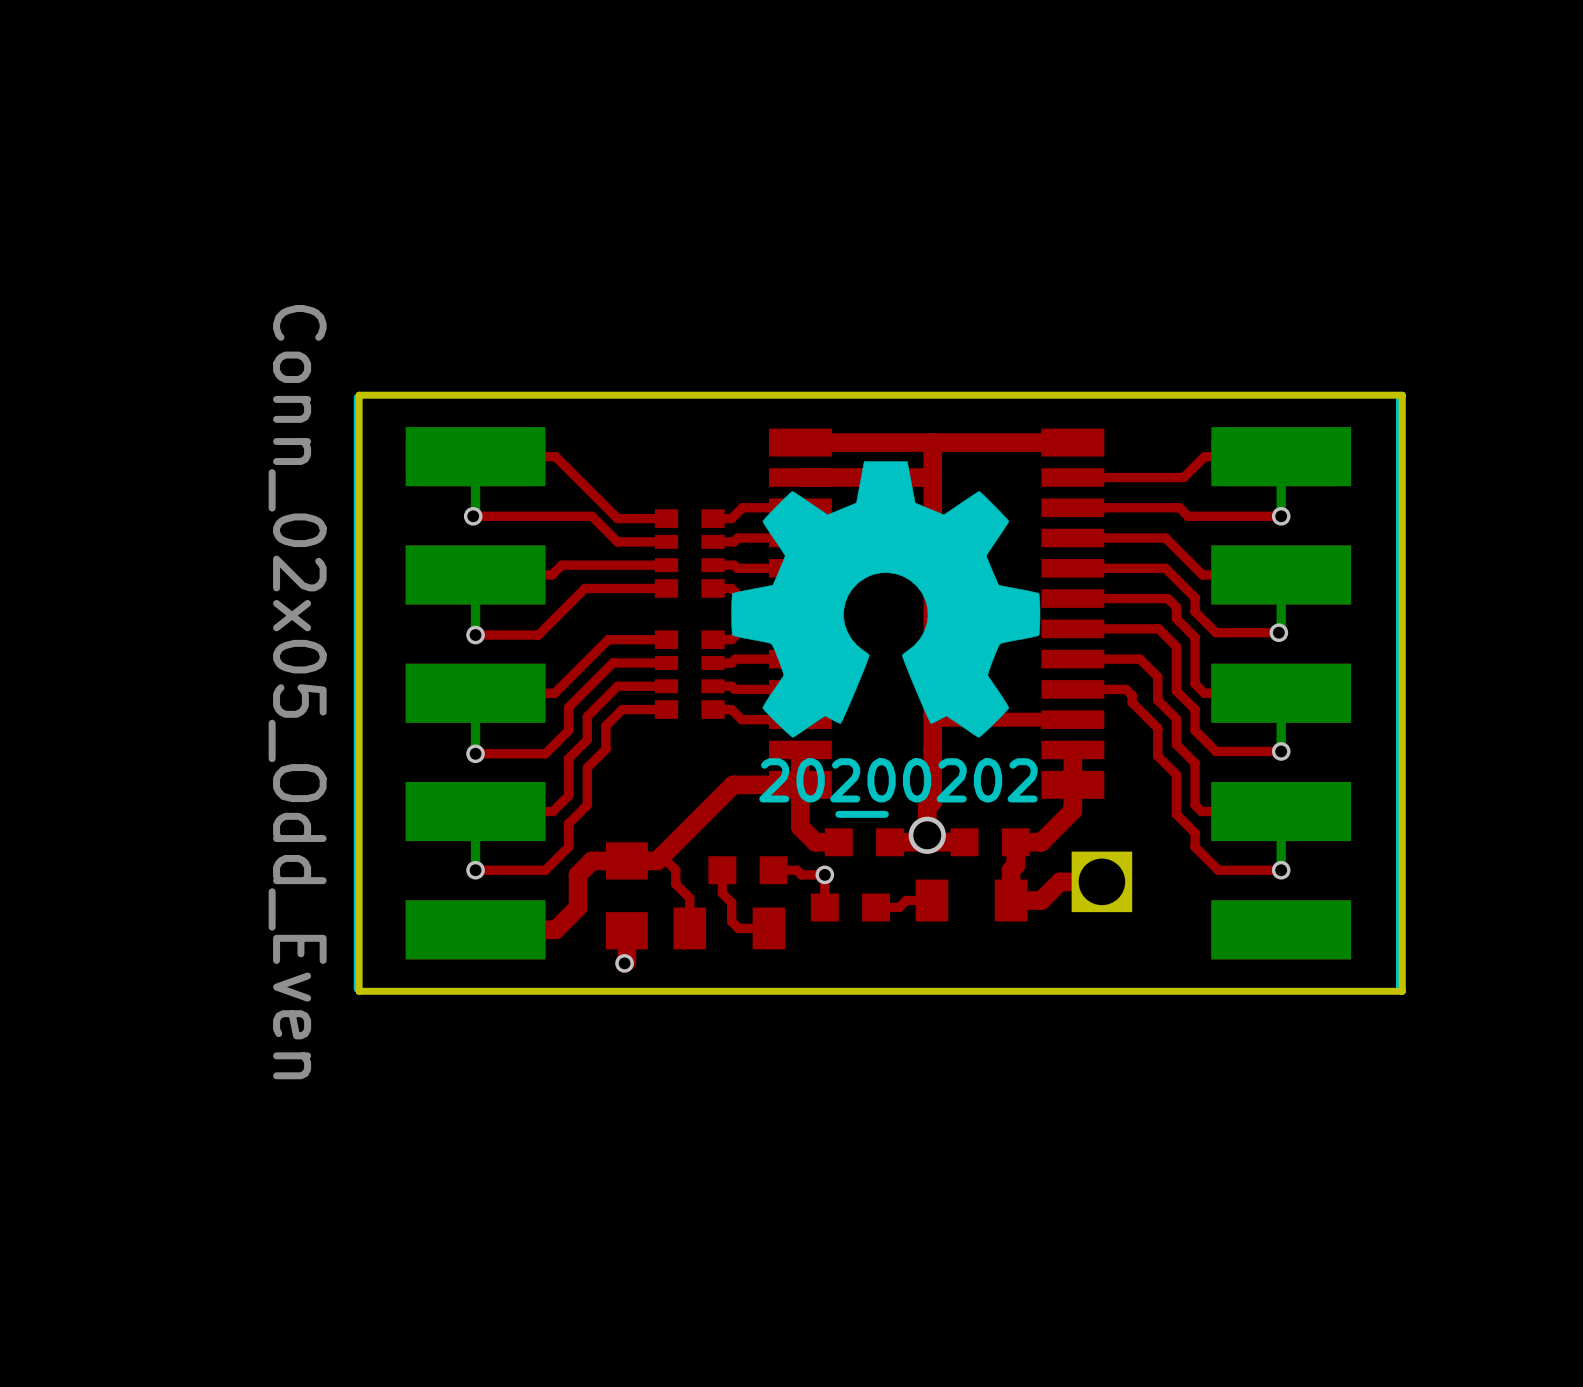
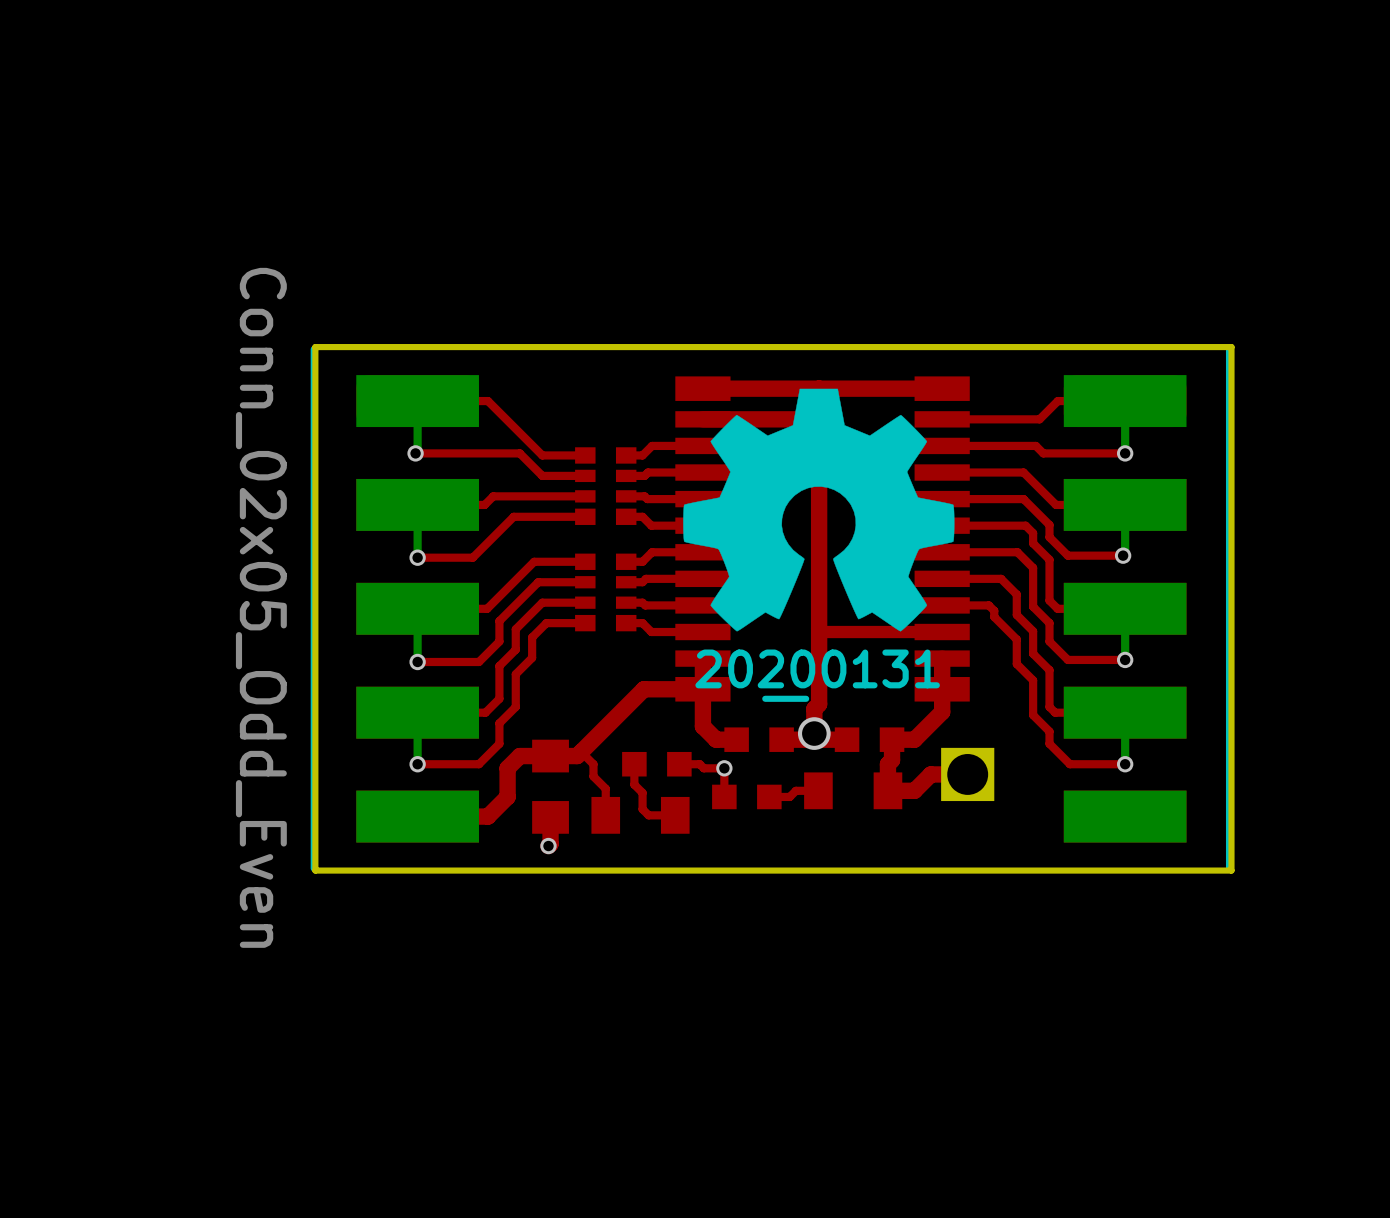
drawing position: (885, 599) -> (818, 510)
drawing shape: [759, 758, 1038, 818] -> [695, 649, 940, 702]

